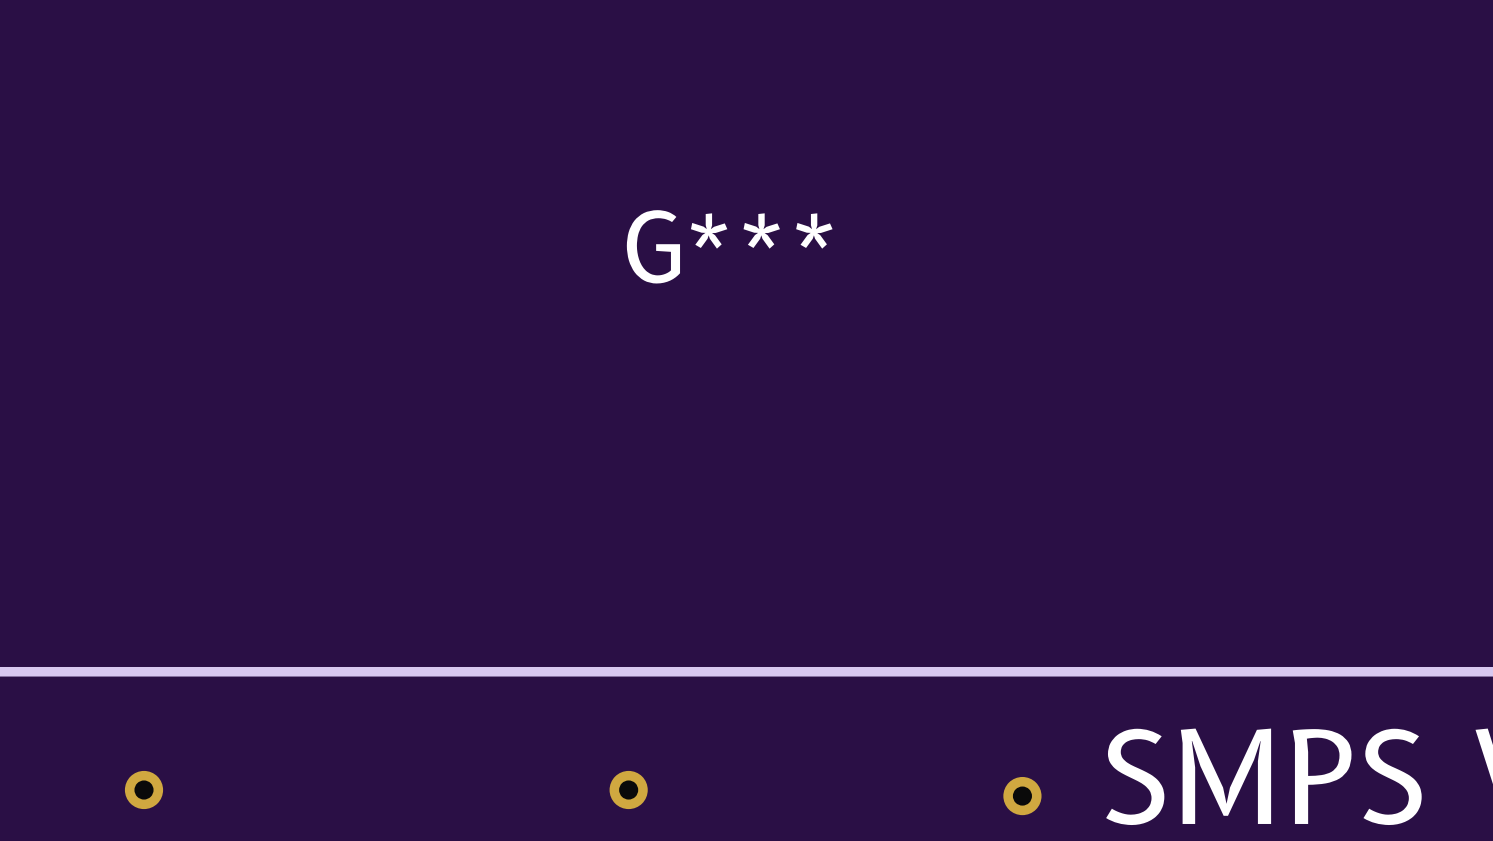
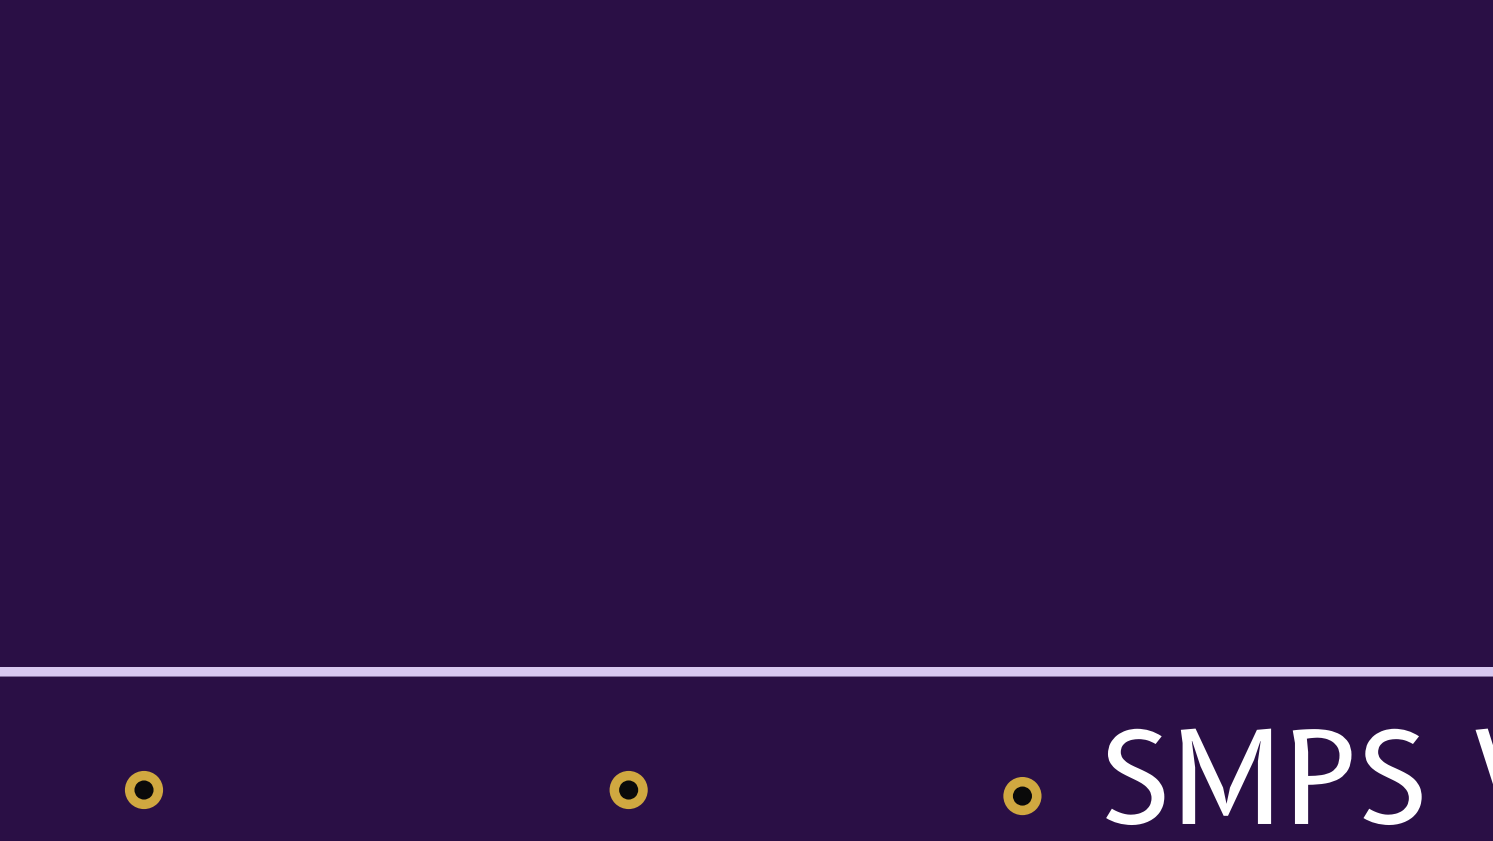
G***: (729, 246) -> none

